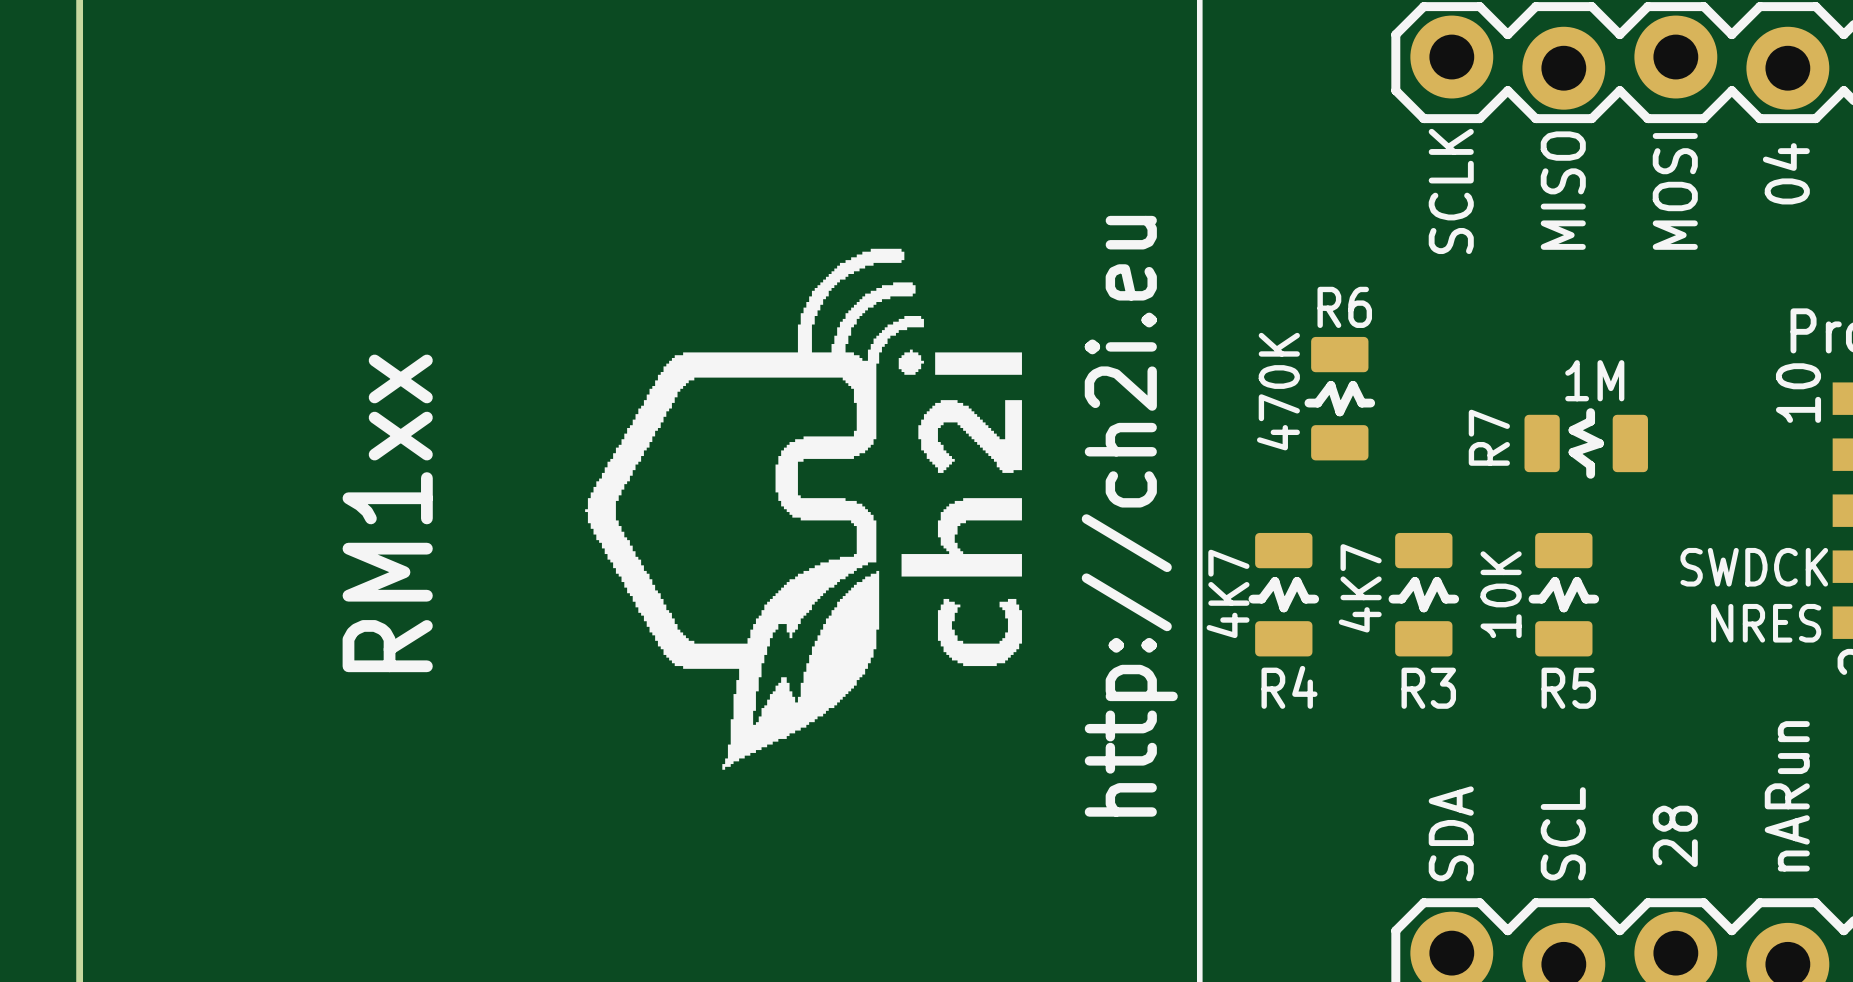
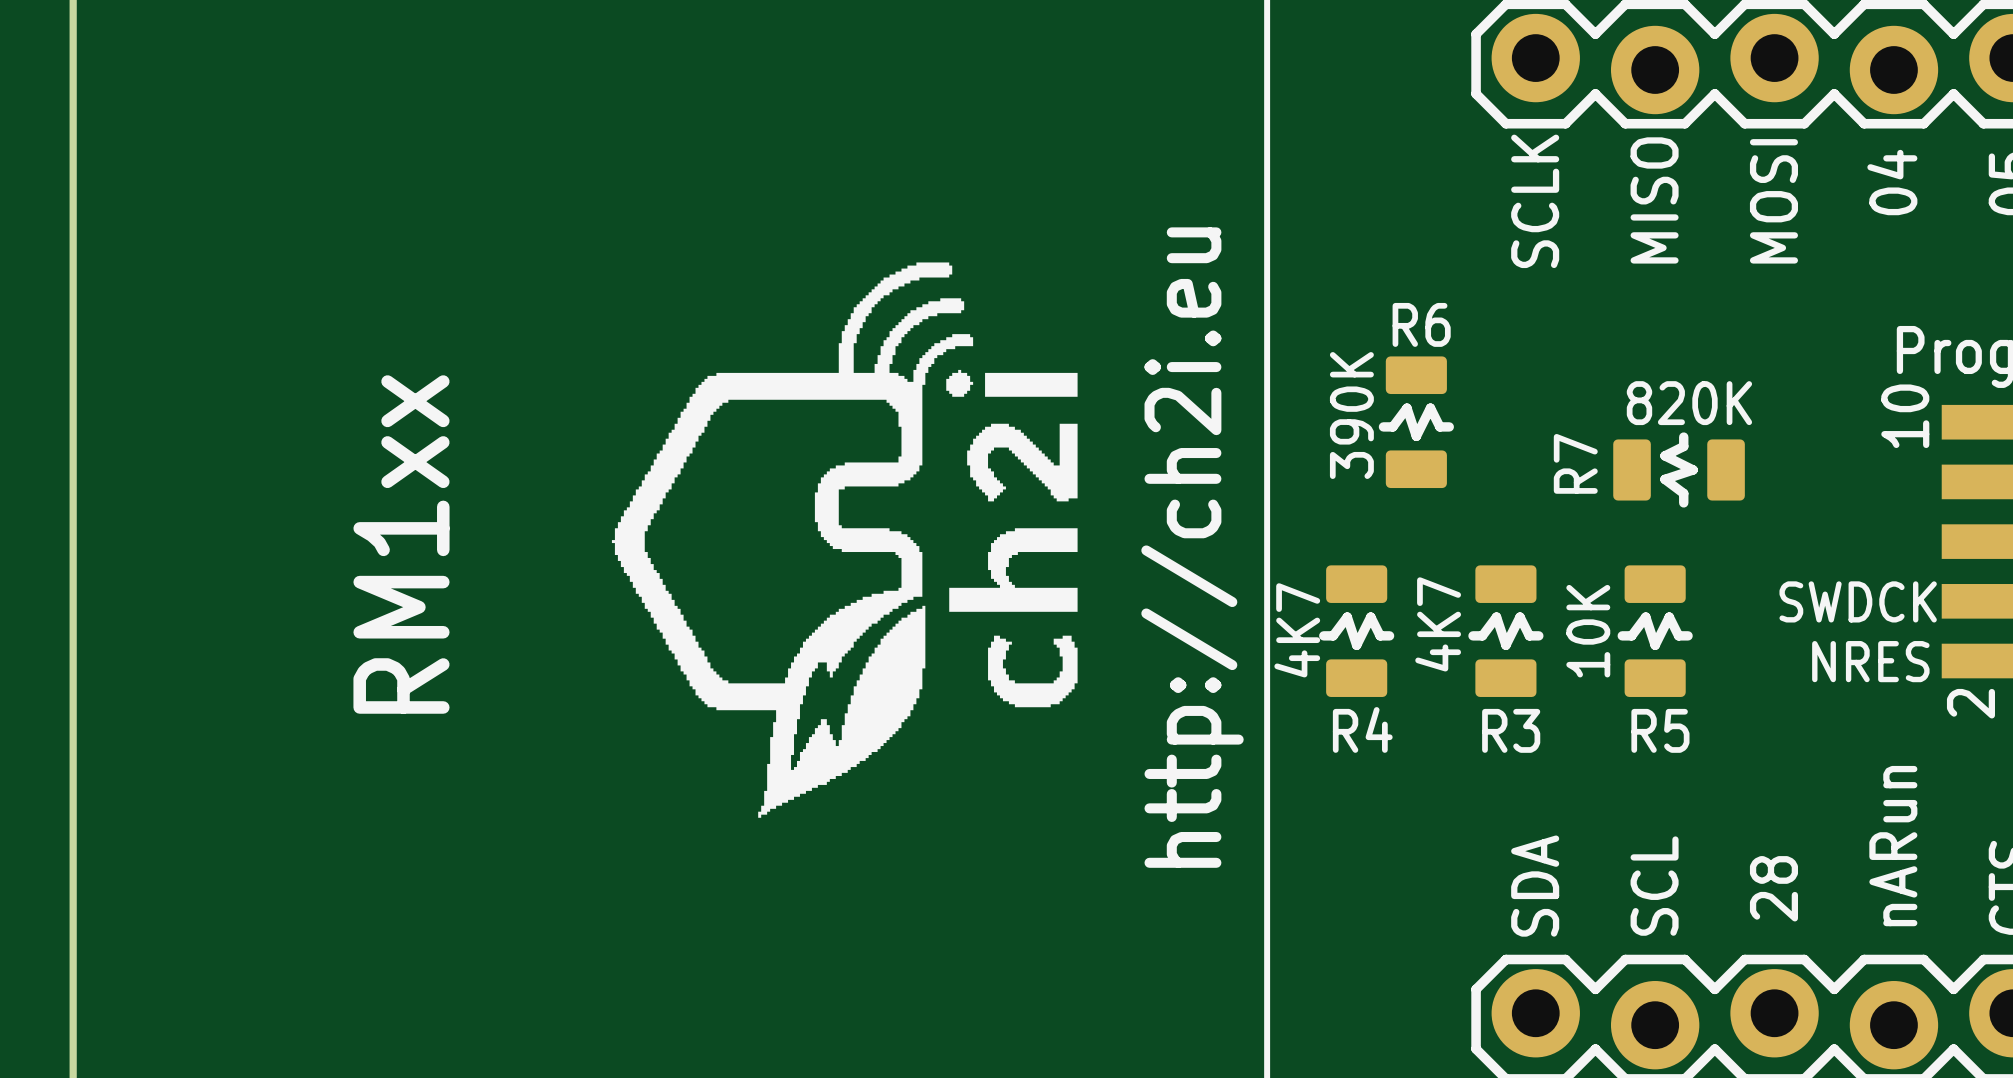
R7 value: 1M (1594, 380) -> 820K (1689, 403)
R6 value: 470K (1278, 391) -> 390K (1351, 415)

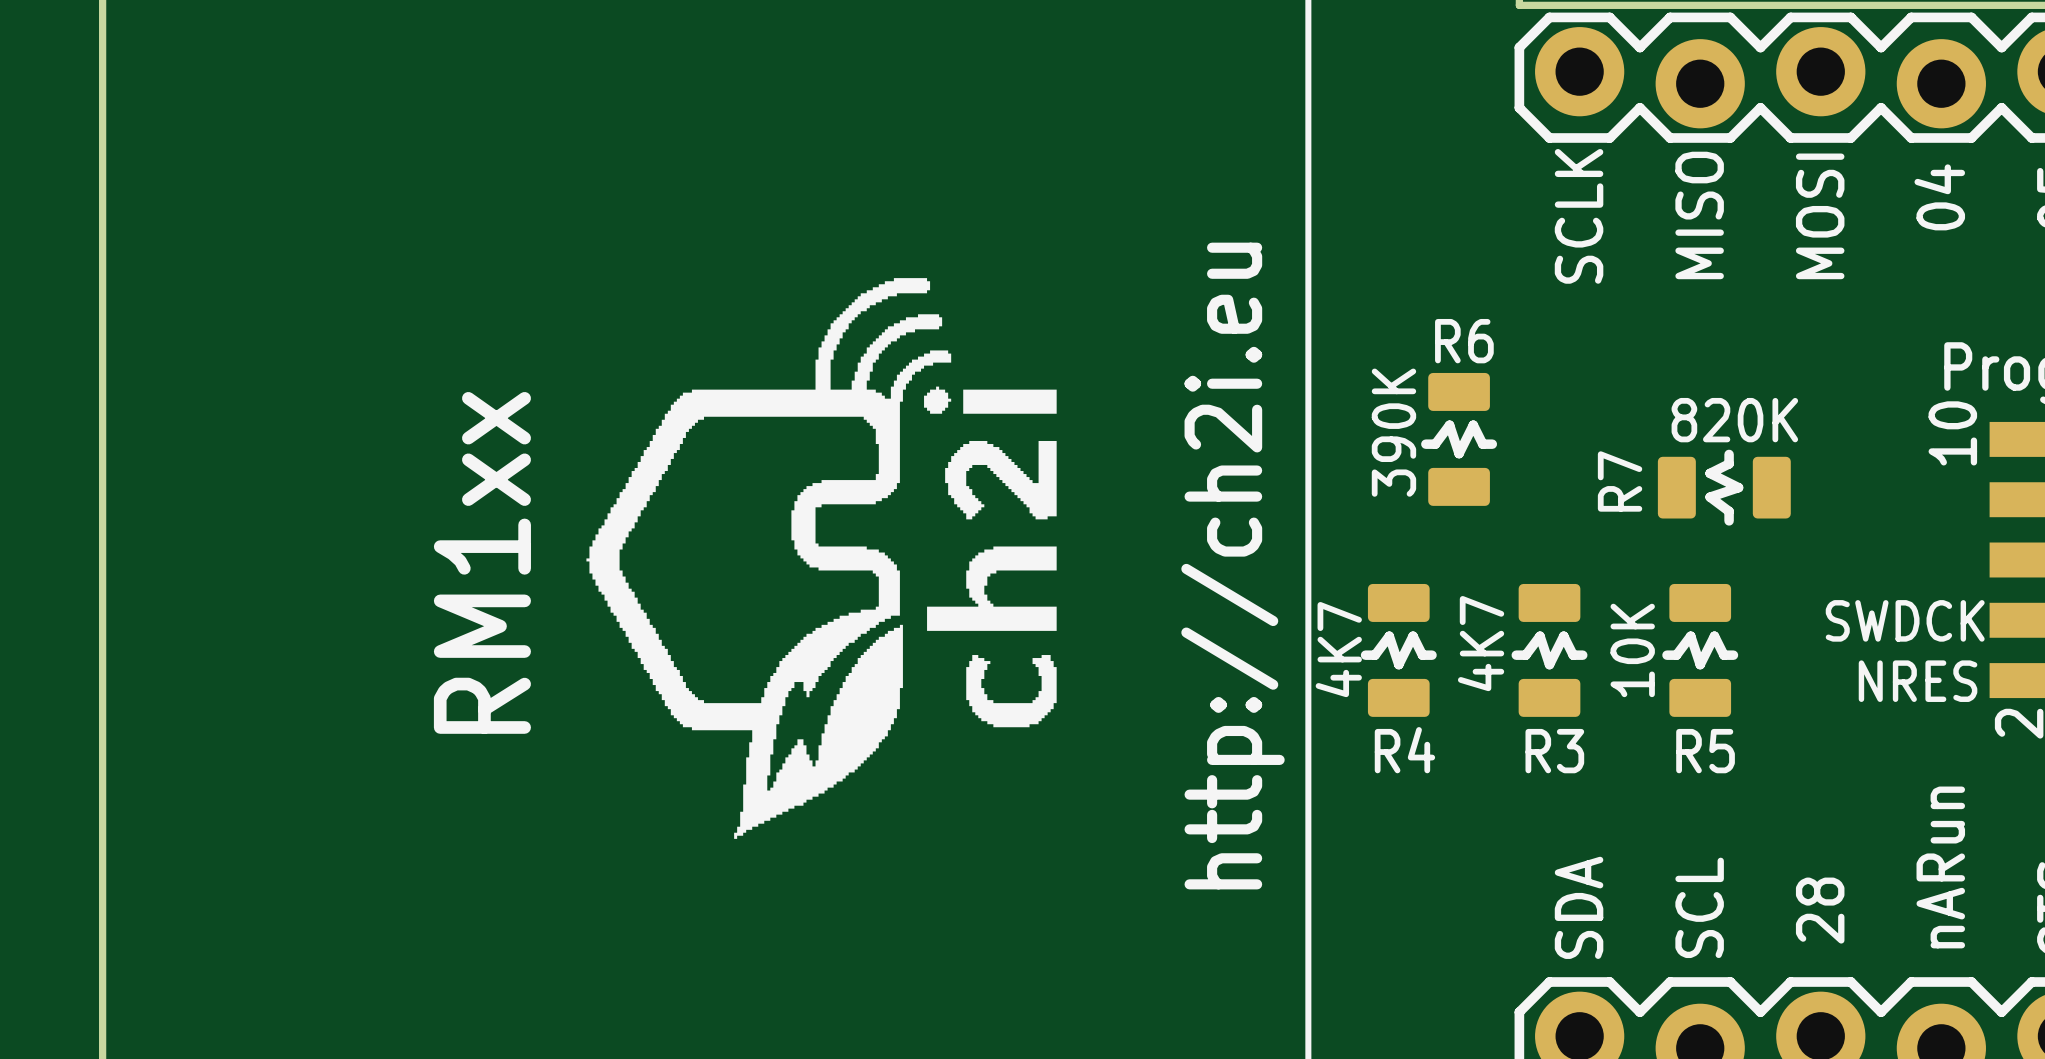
drawing position: (844, 540) -> (821, 558)
part value position: RM1xx (401, 544) -> RM1xx (482, 562)

